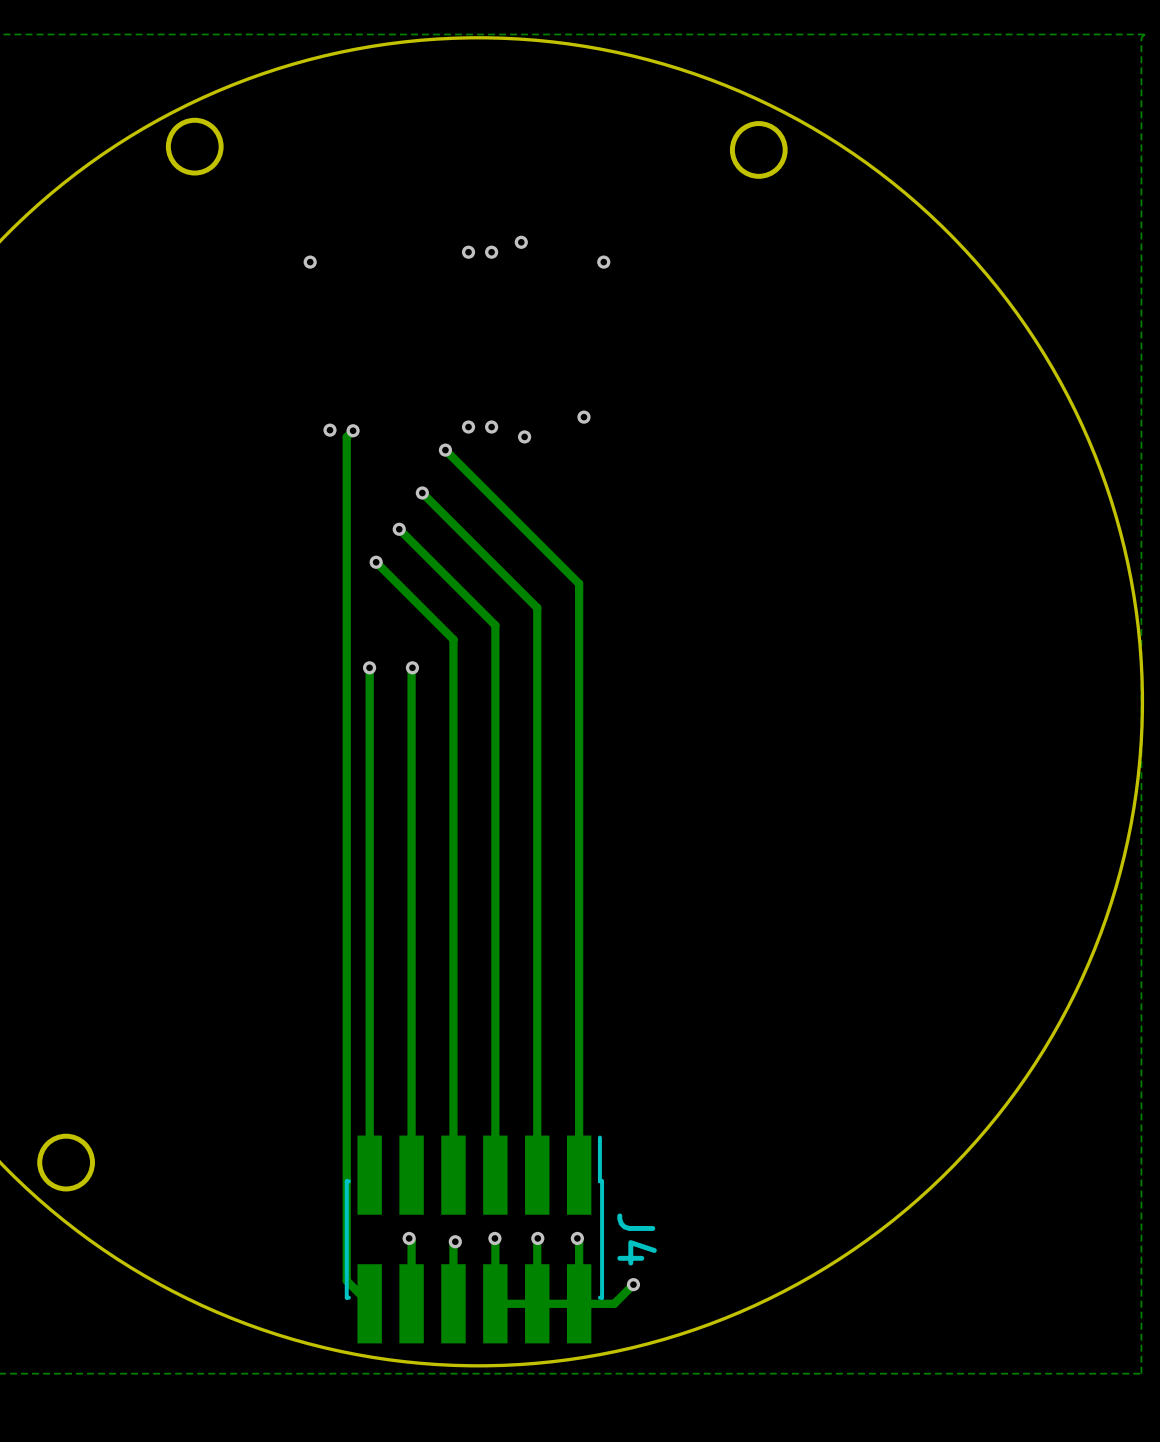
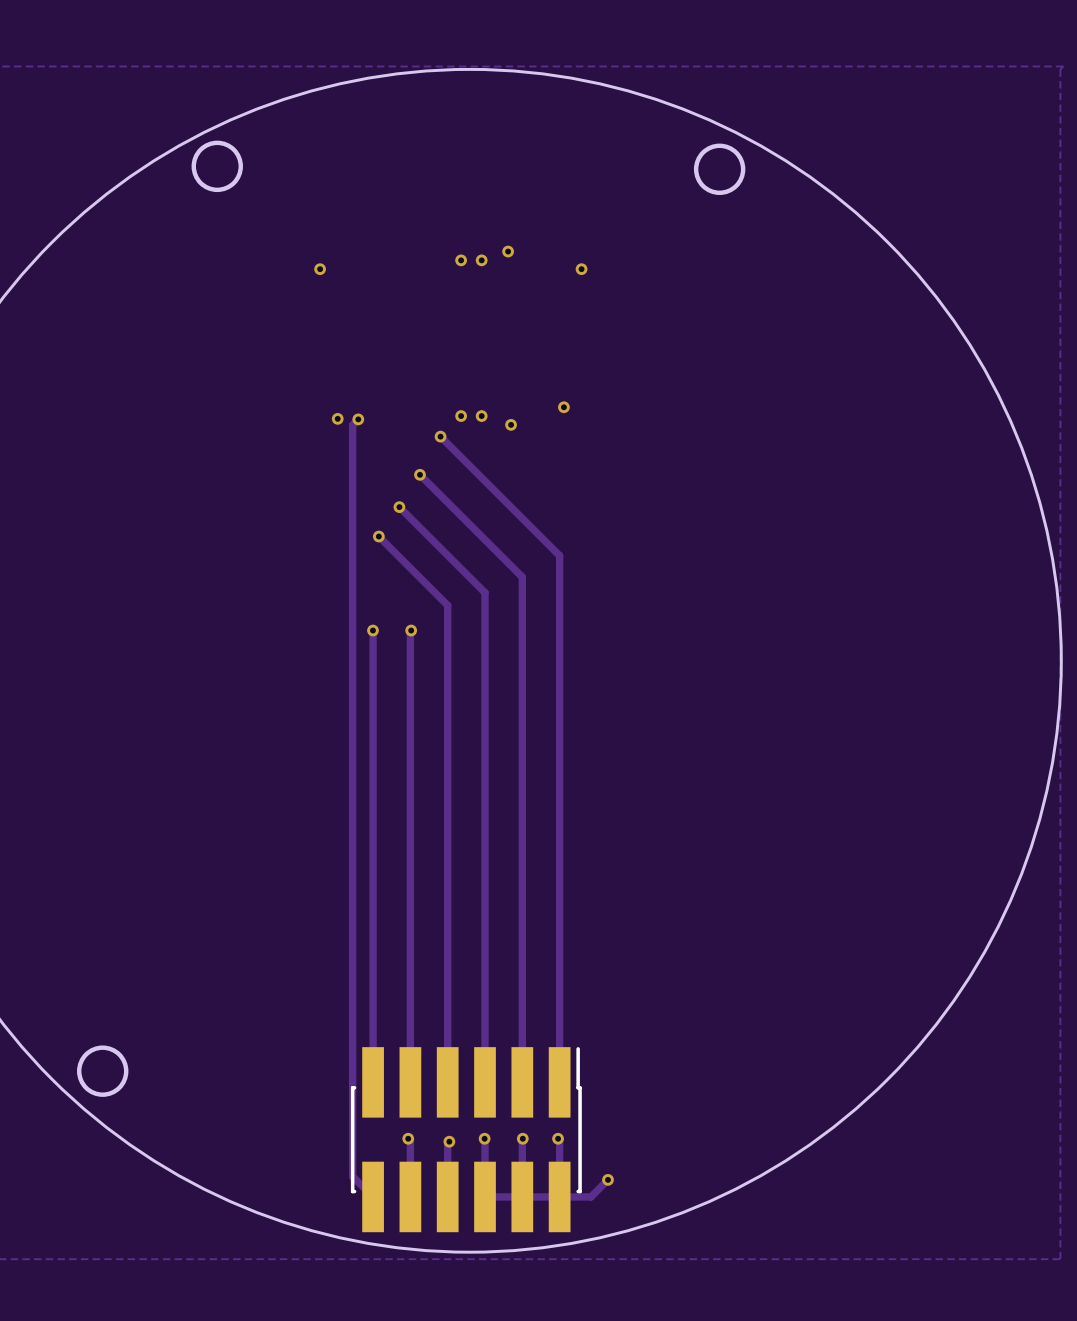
J4 name: J4 (637, 1239) -> none

